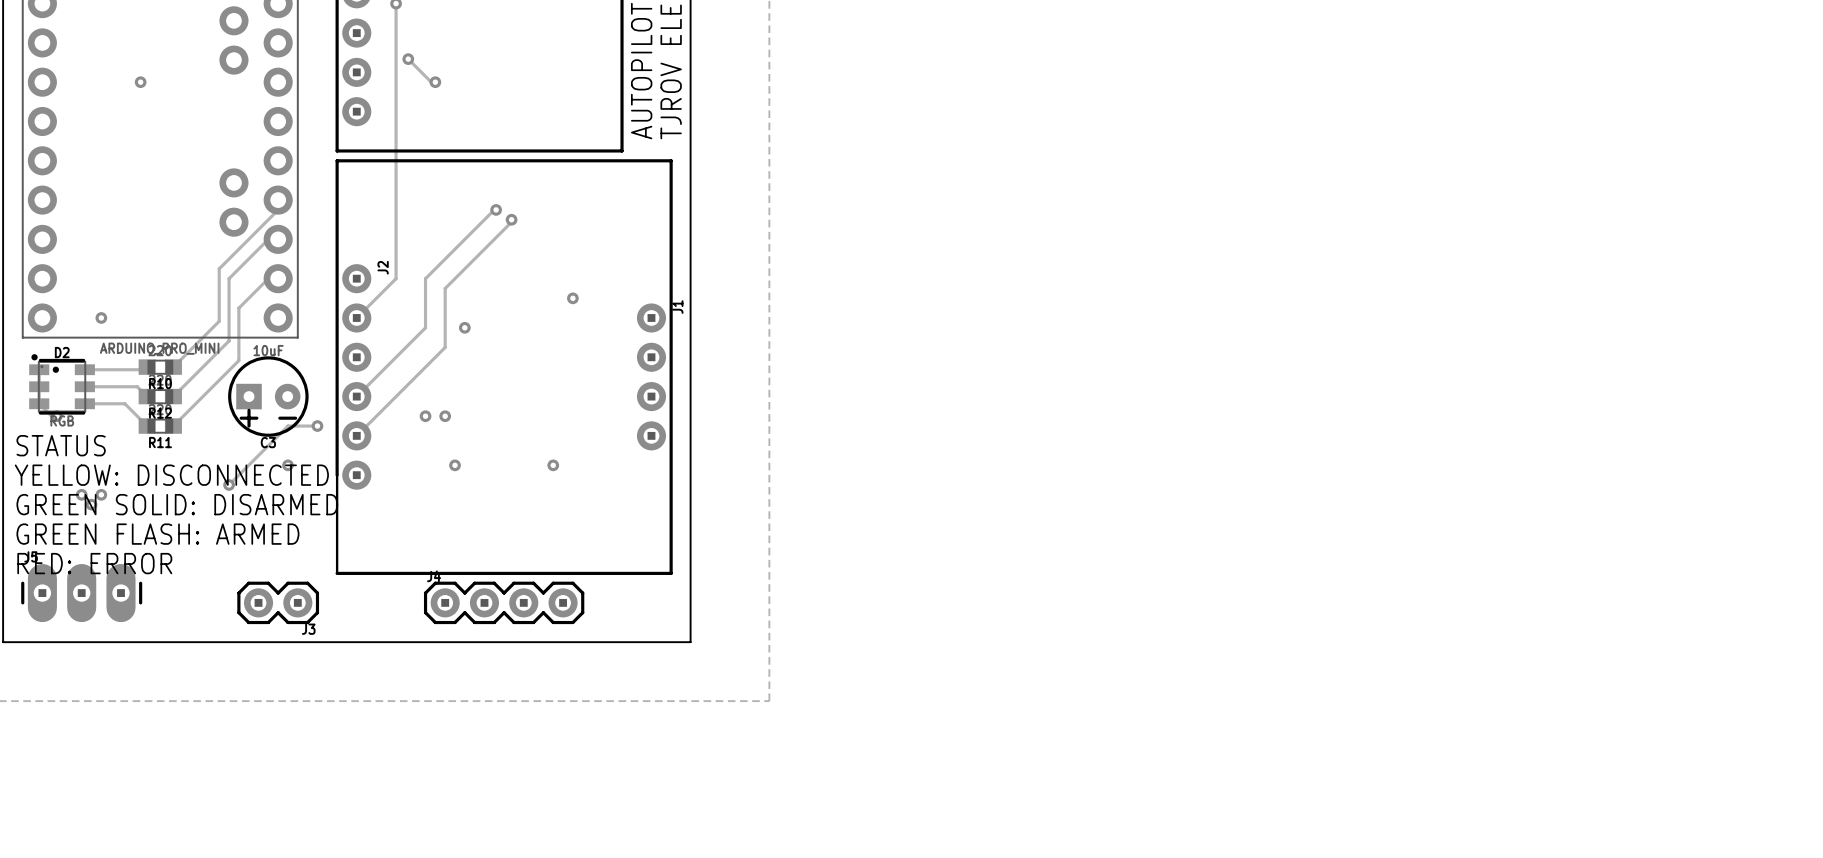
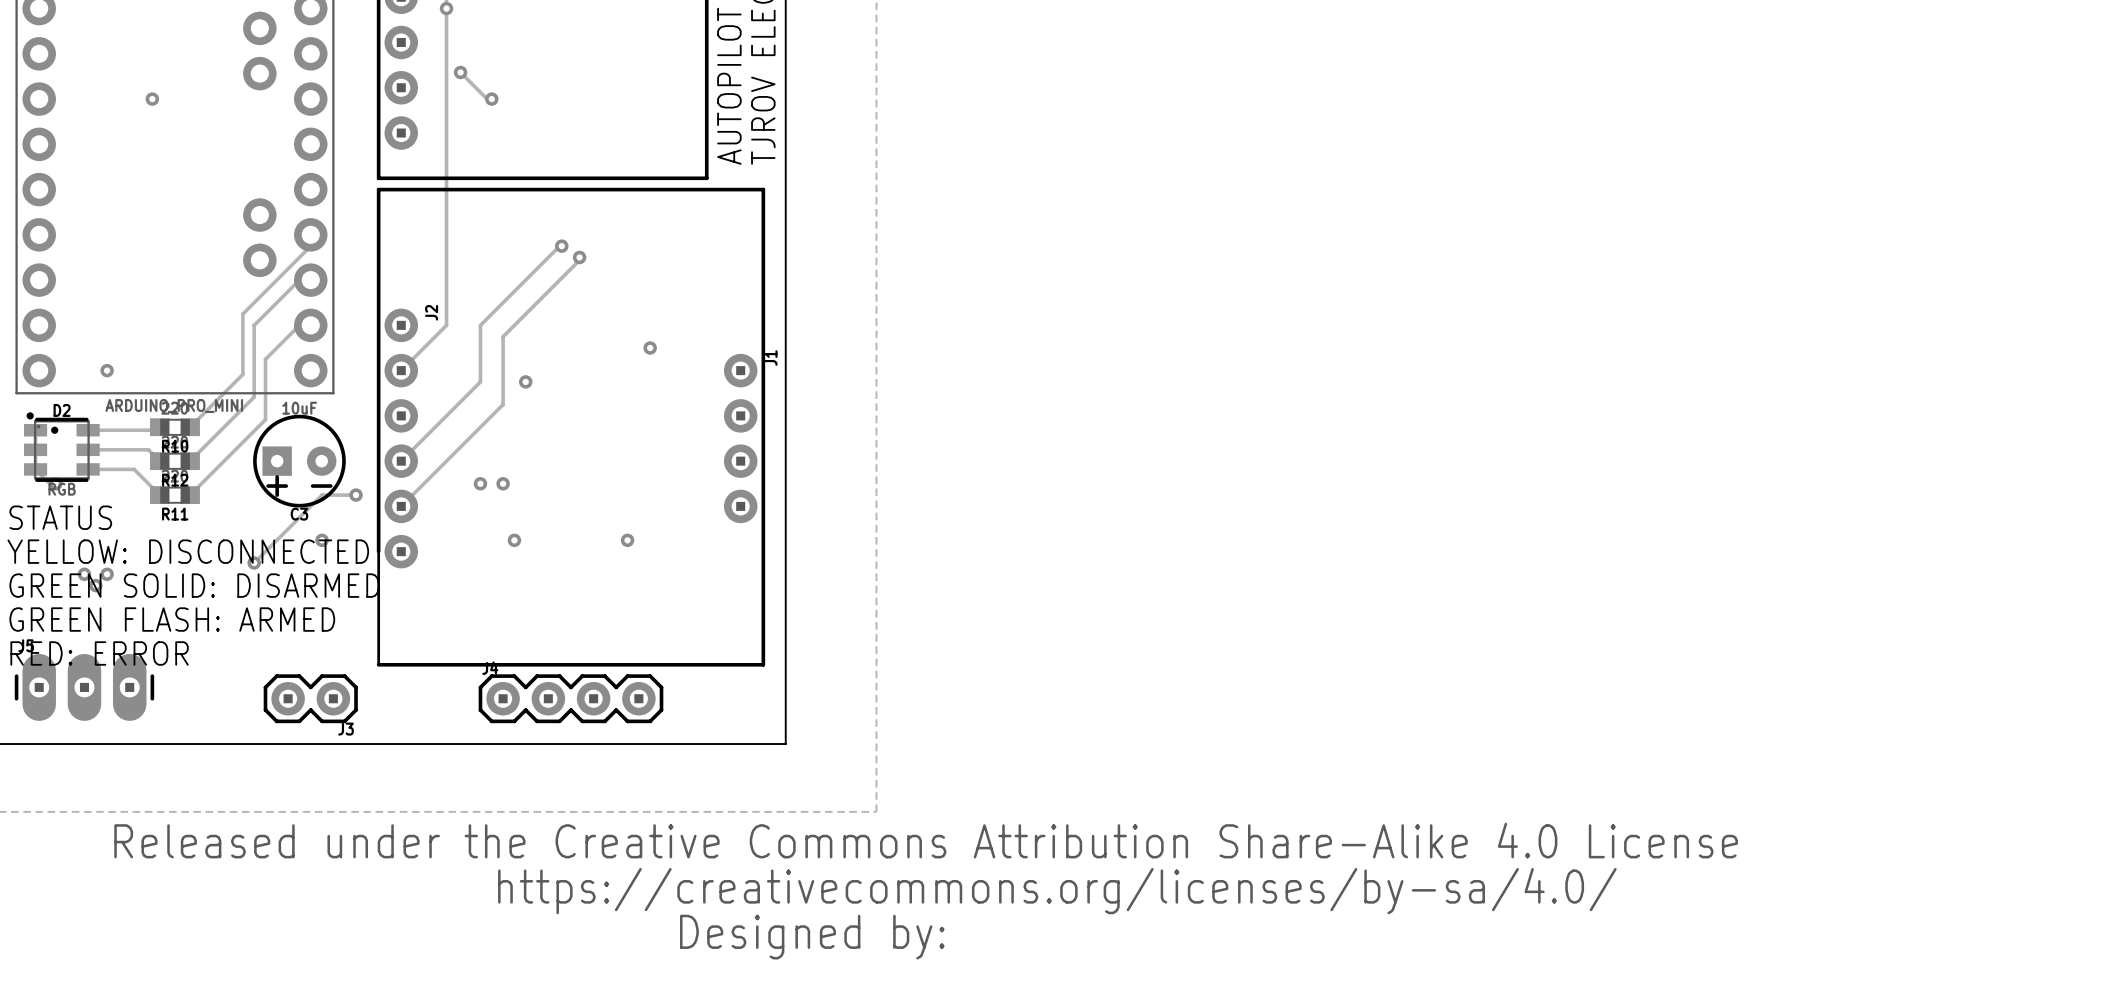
drawing: none -> [114, 822, 1738, 960]

